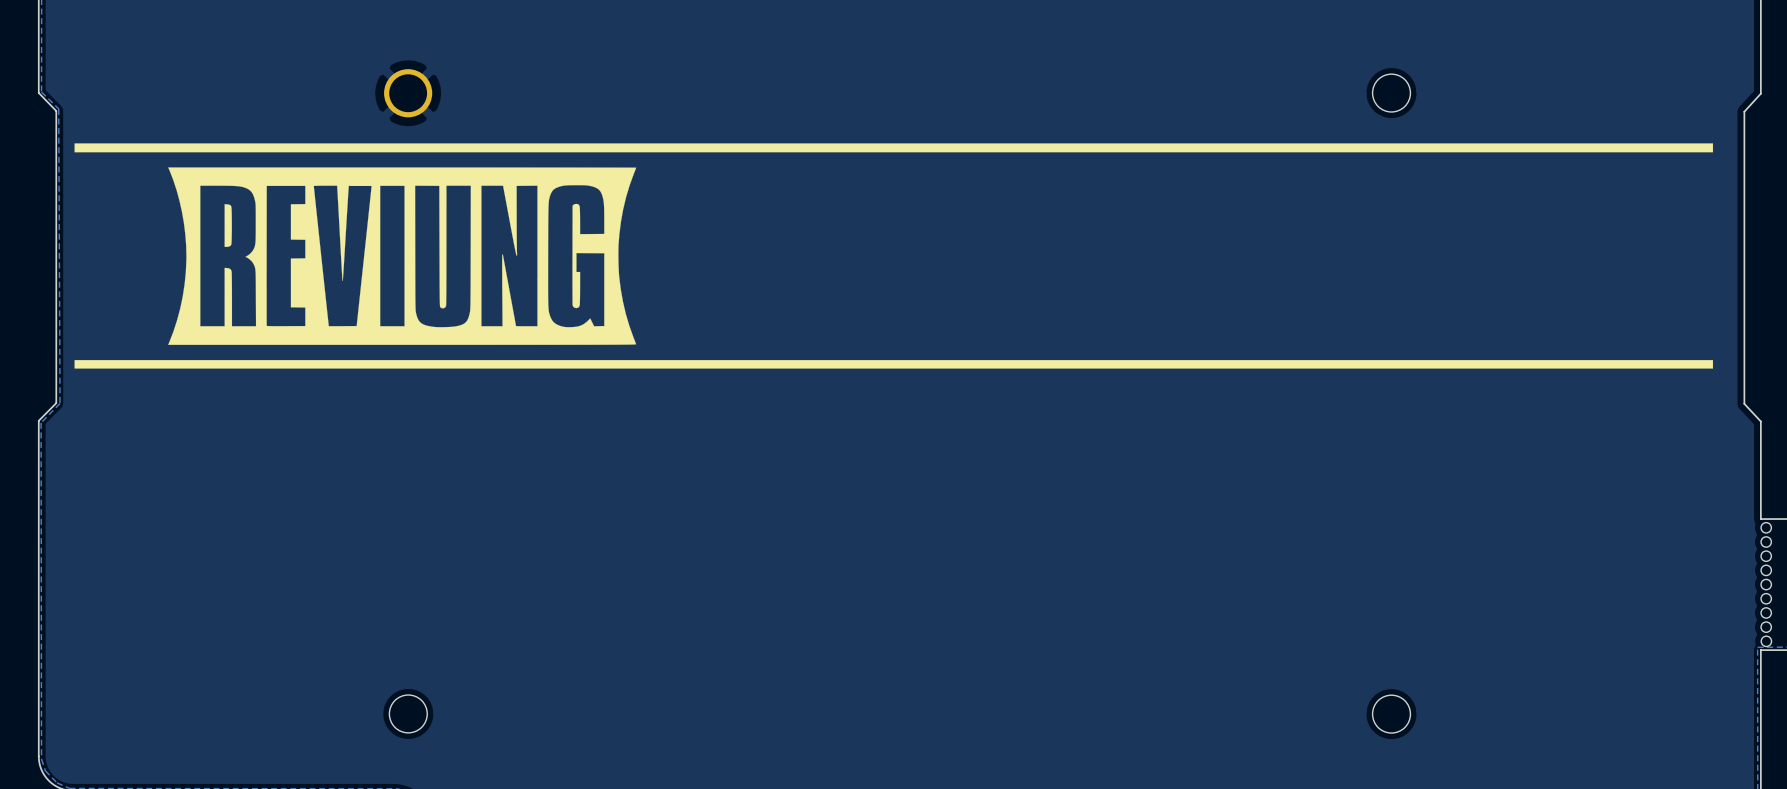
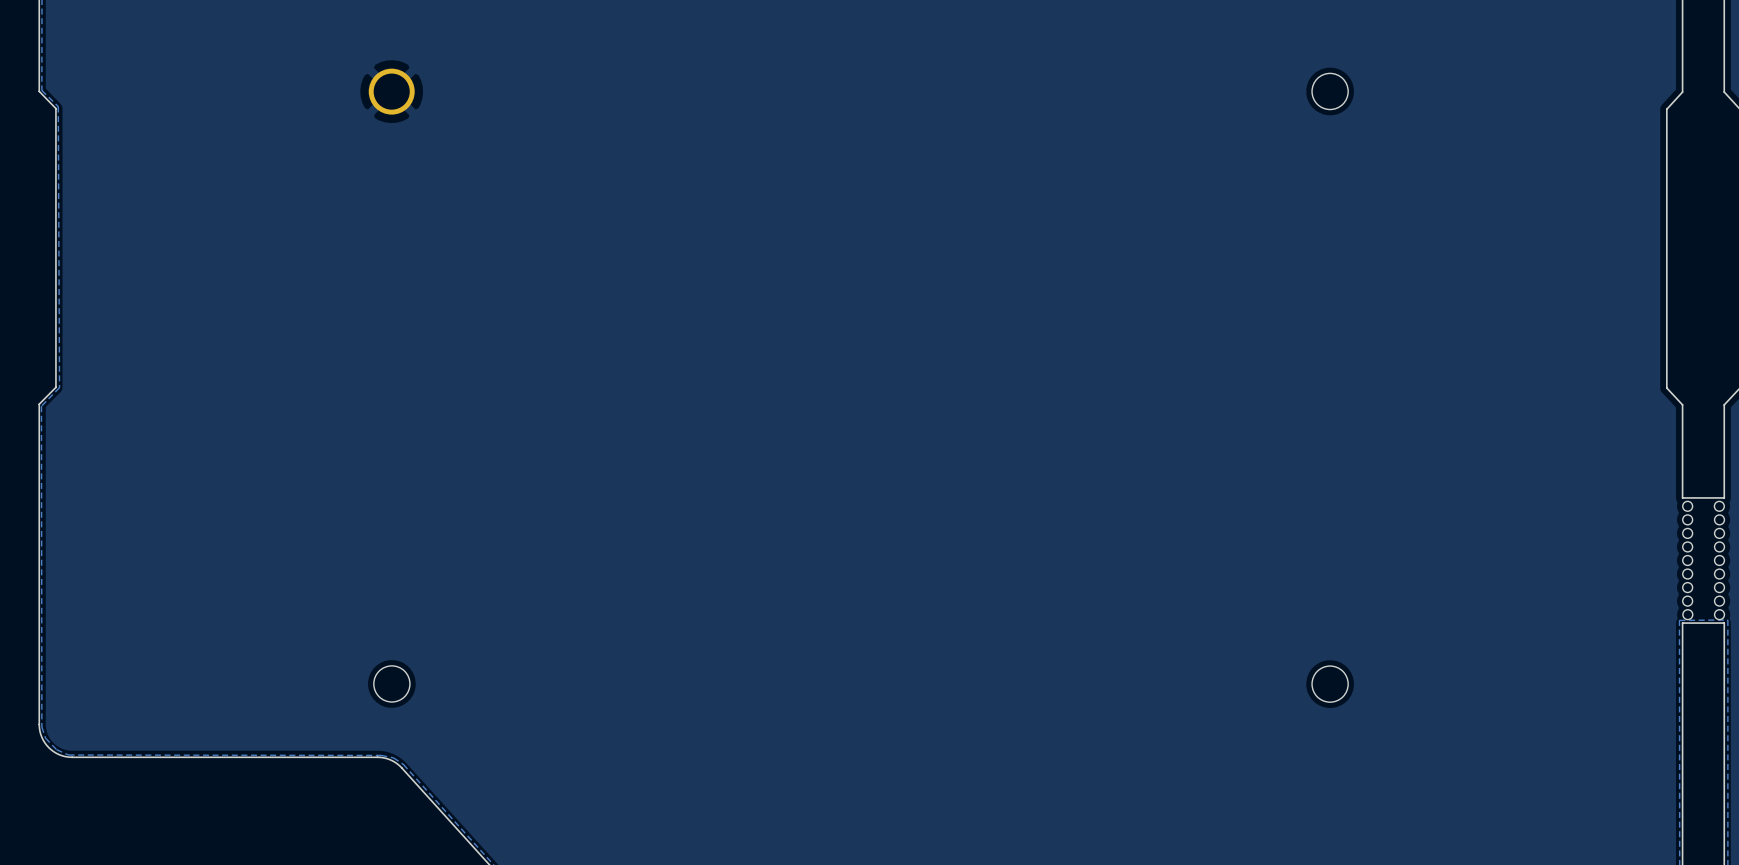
drawing: [74, 143, 1714, 369] -> none

